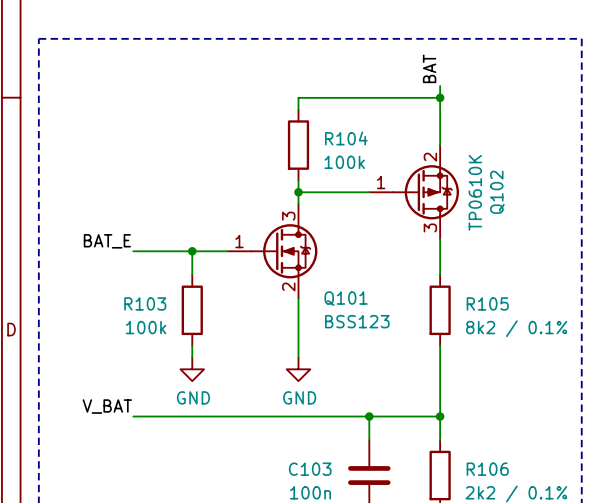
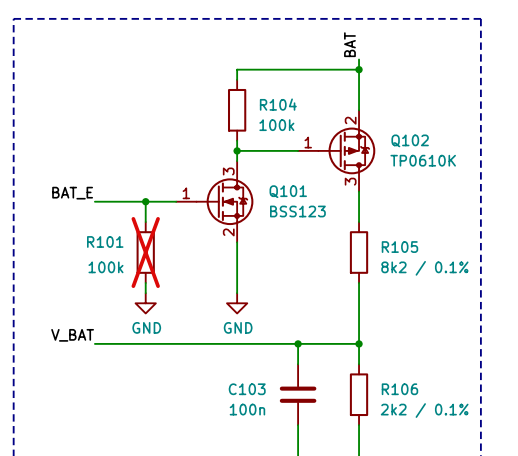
Q102 value rotation: 0° (475, 192) -> 90° clockwise (423, 160)
Q102 name rotation: 0° (497, 192) -> 90° clockwise (410, 140)
Q101 name position: Q101 (346, 298) -> Q101 (288, 191)
R103 name: R103 (145, 303) -> R101 (105, 241)
R103 do-not-place cross: none -> (145, 252)
Q101 value position: BSS123 (357, 321) -> BSS123 (297, 211)

